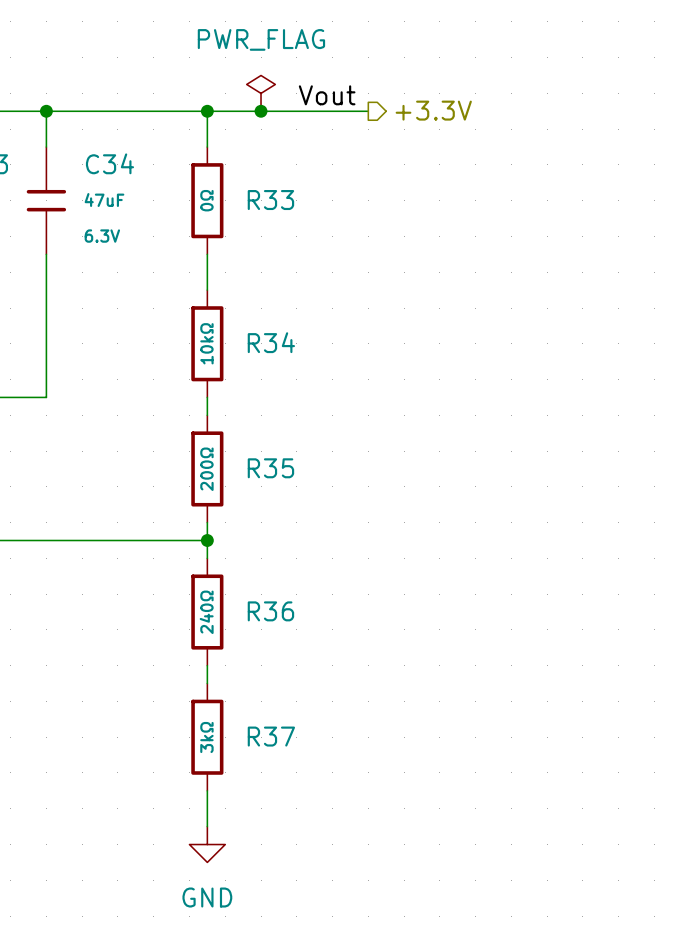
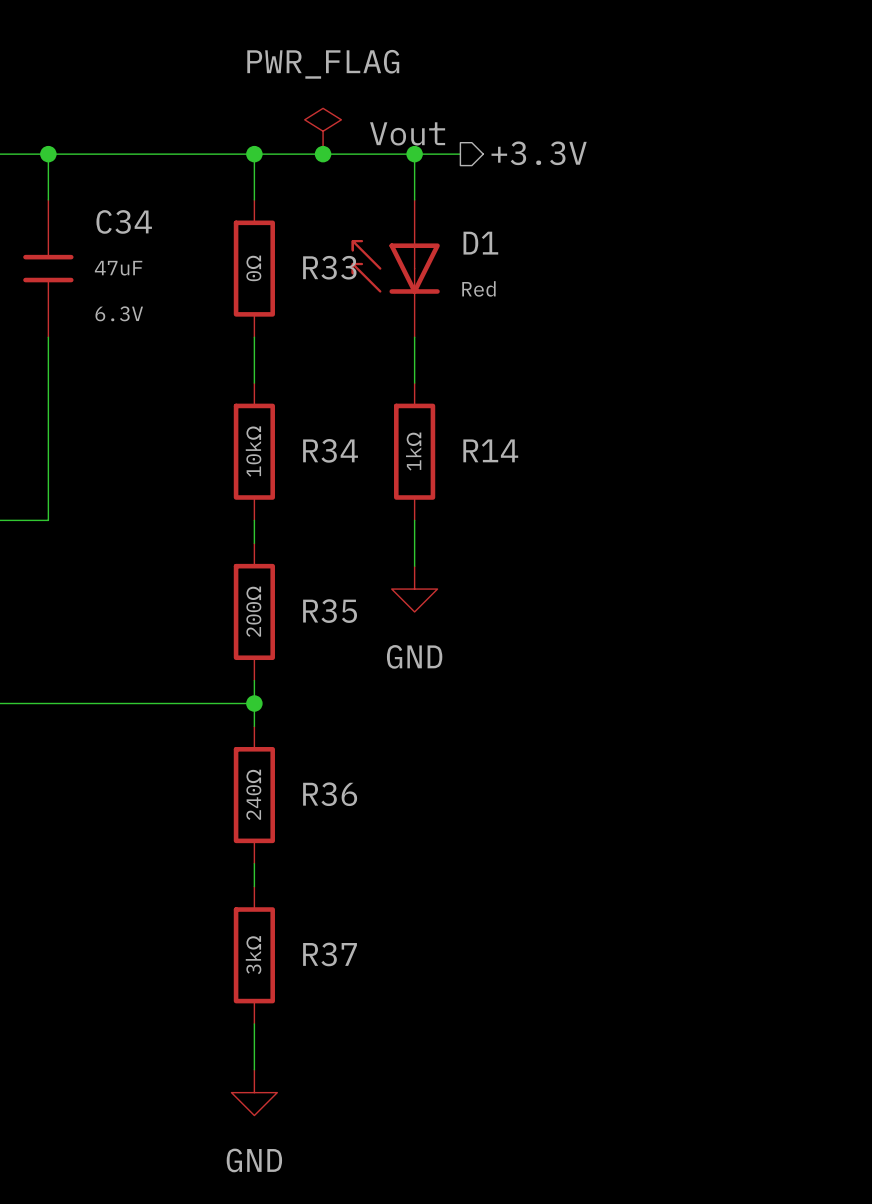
wire: none -> (414, 154) (414, 199)
junction: none -> (414, 154)
D1: none -> Red (395, 268)
wire: none -> (414, 337) (414, 383)
R14: none -> 1kΩ (414, 451)
wire: none -> (414, 520) (414, 566)
power symbol: none -> GND (414, 589)

